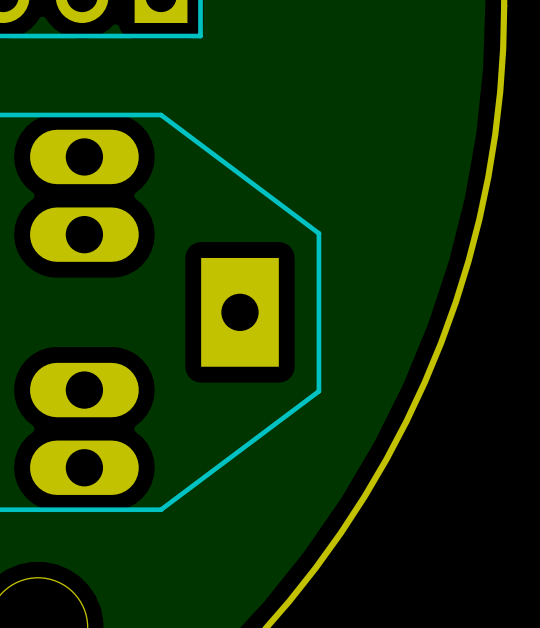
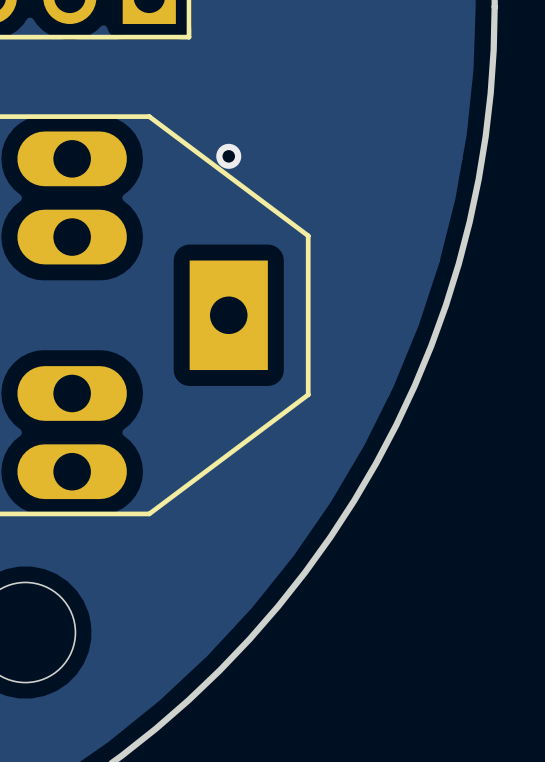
via: none -> (228, 156)

